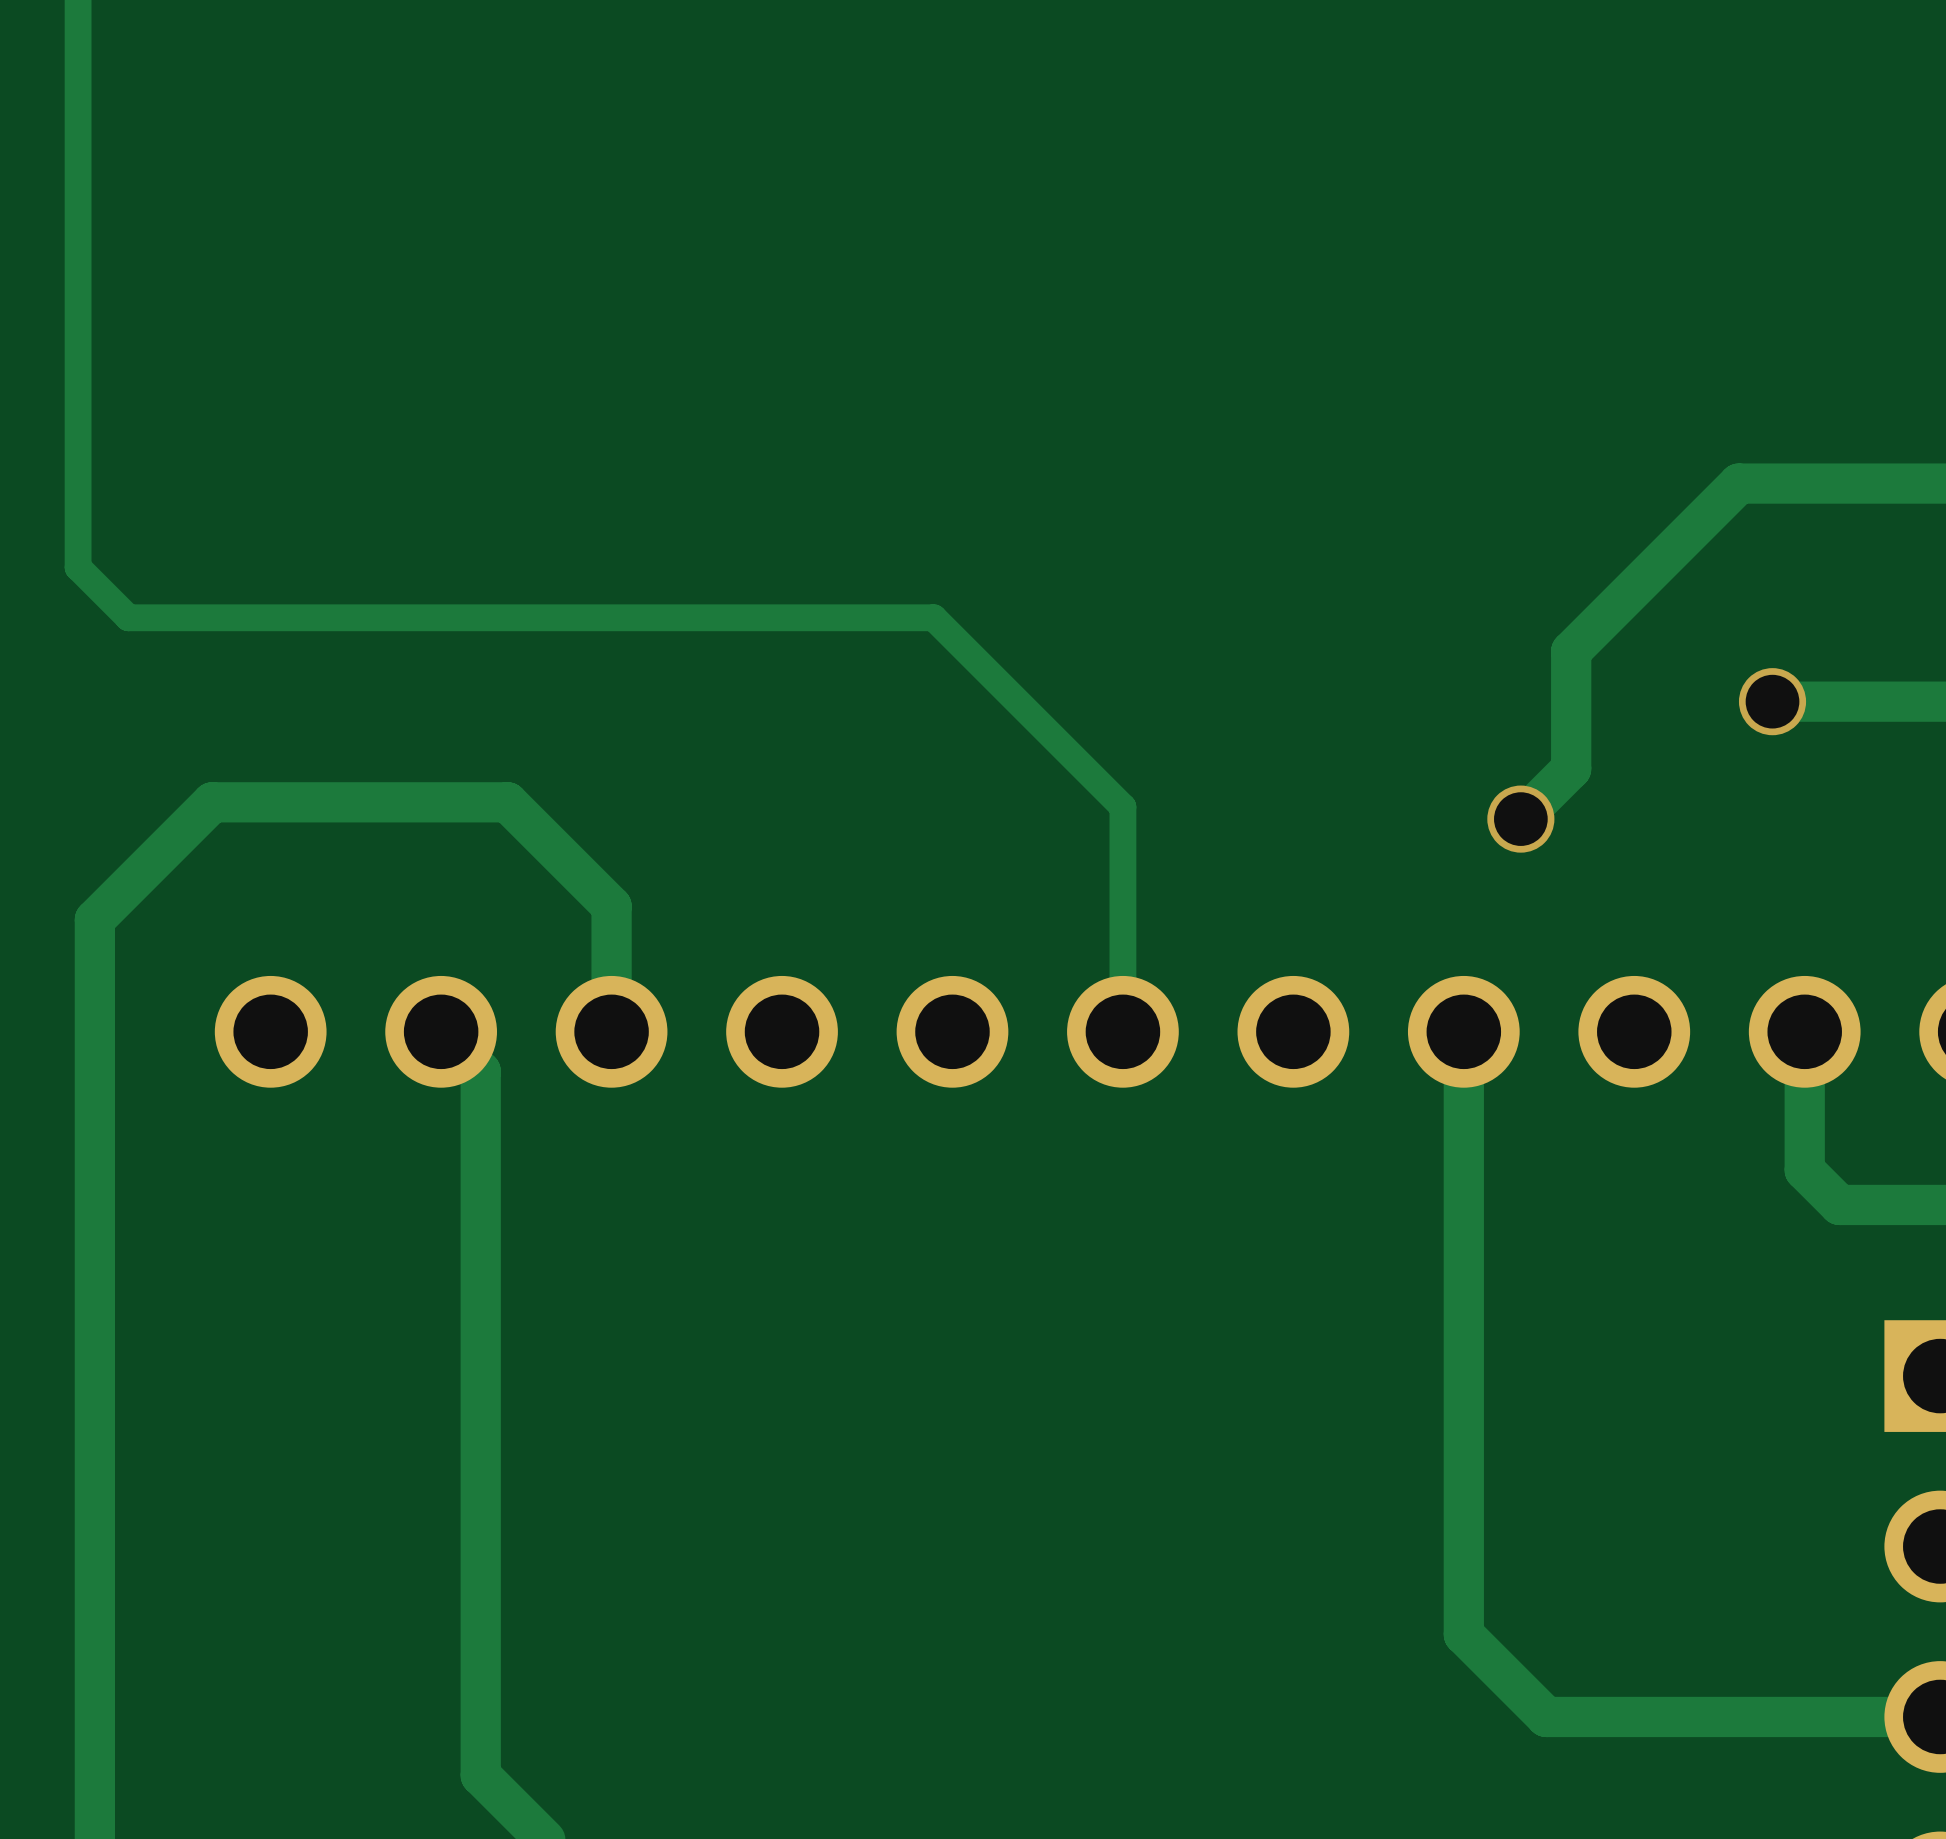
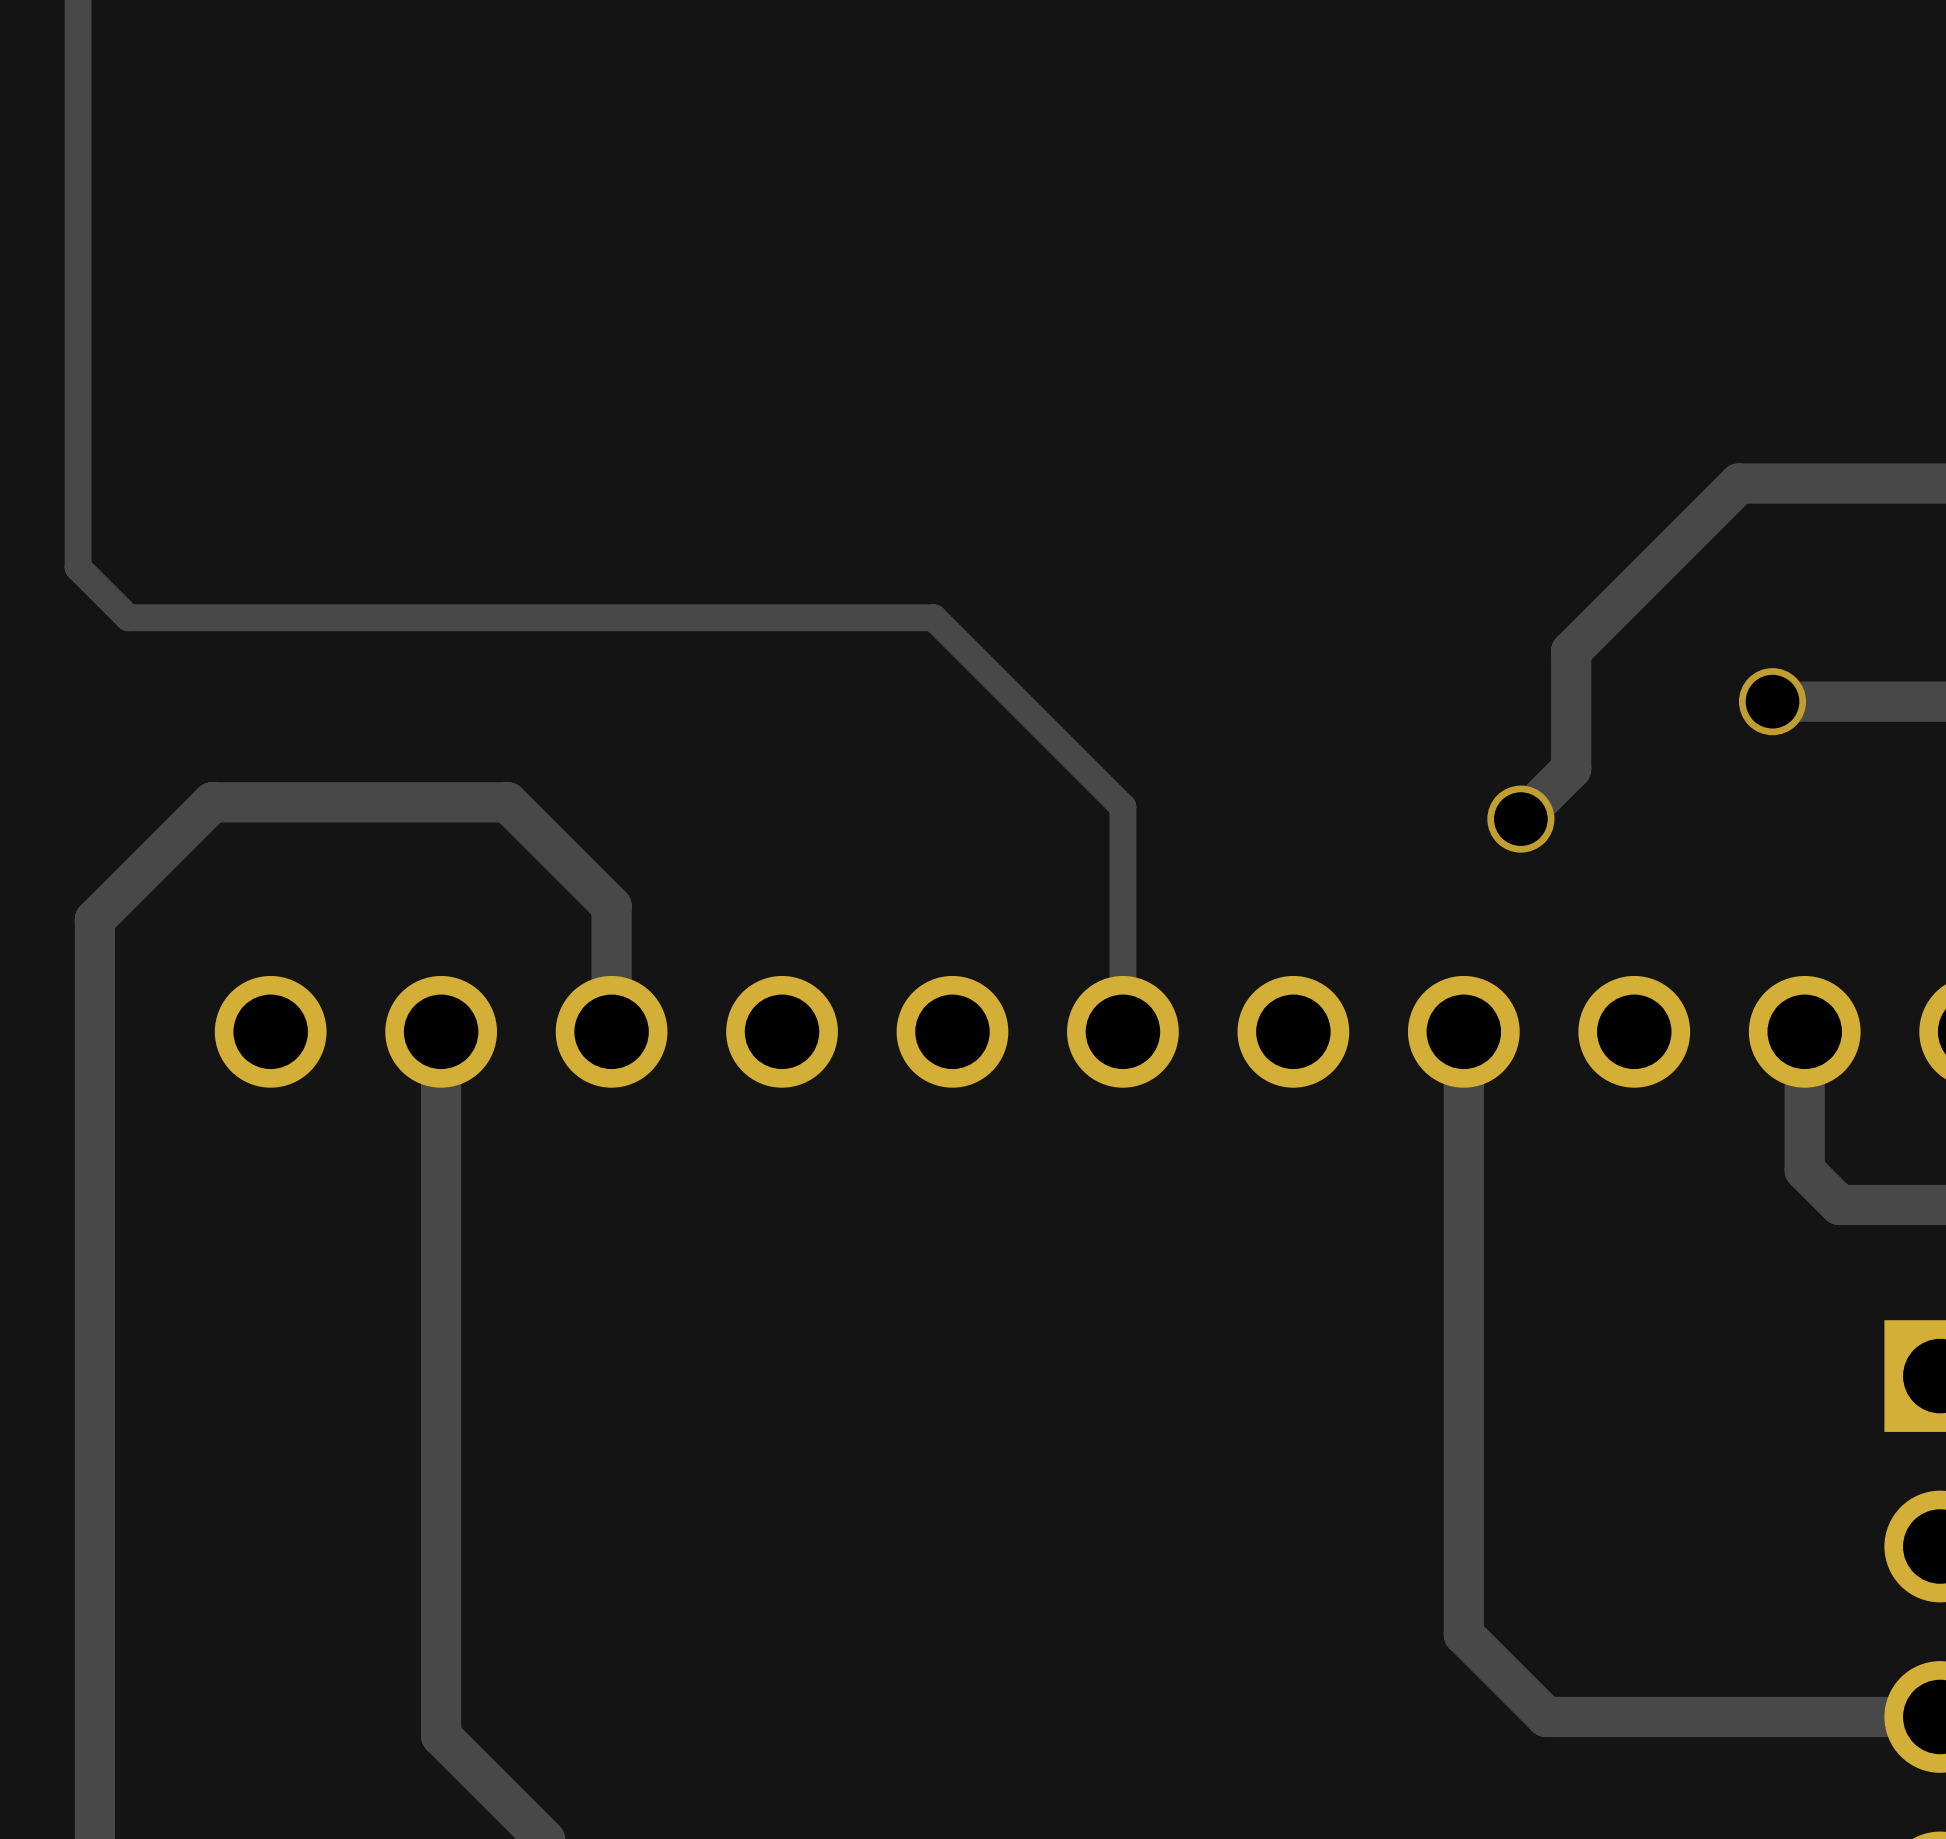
track: (441, 1031) (480, 1071) (480, 1775) -> (441, 1031) (441, 1735) (480, 1775)

